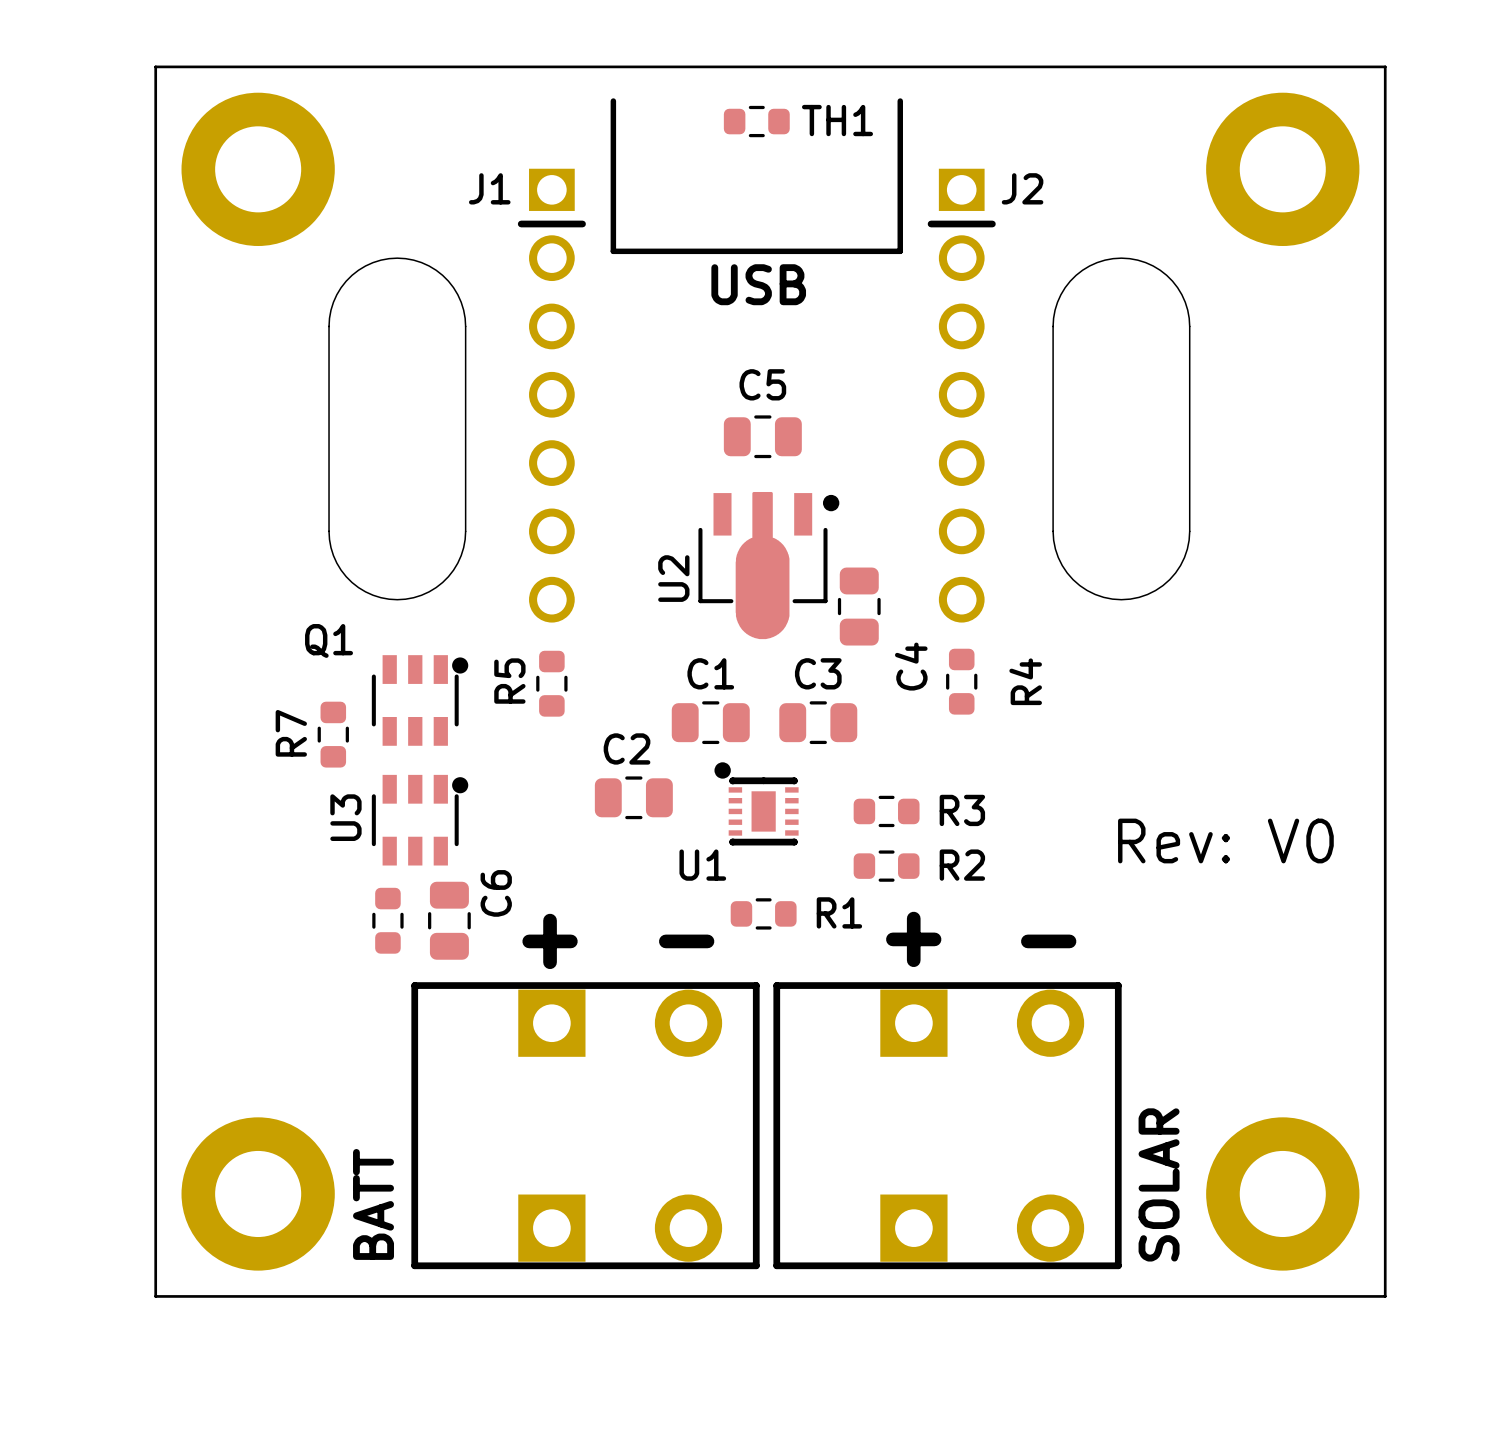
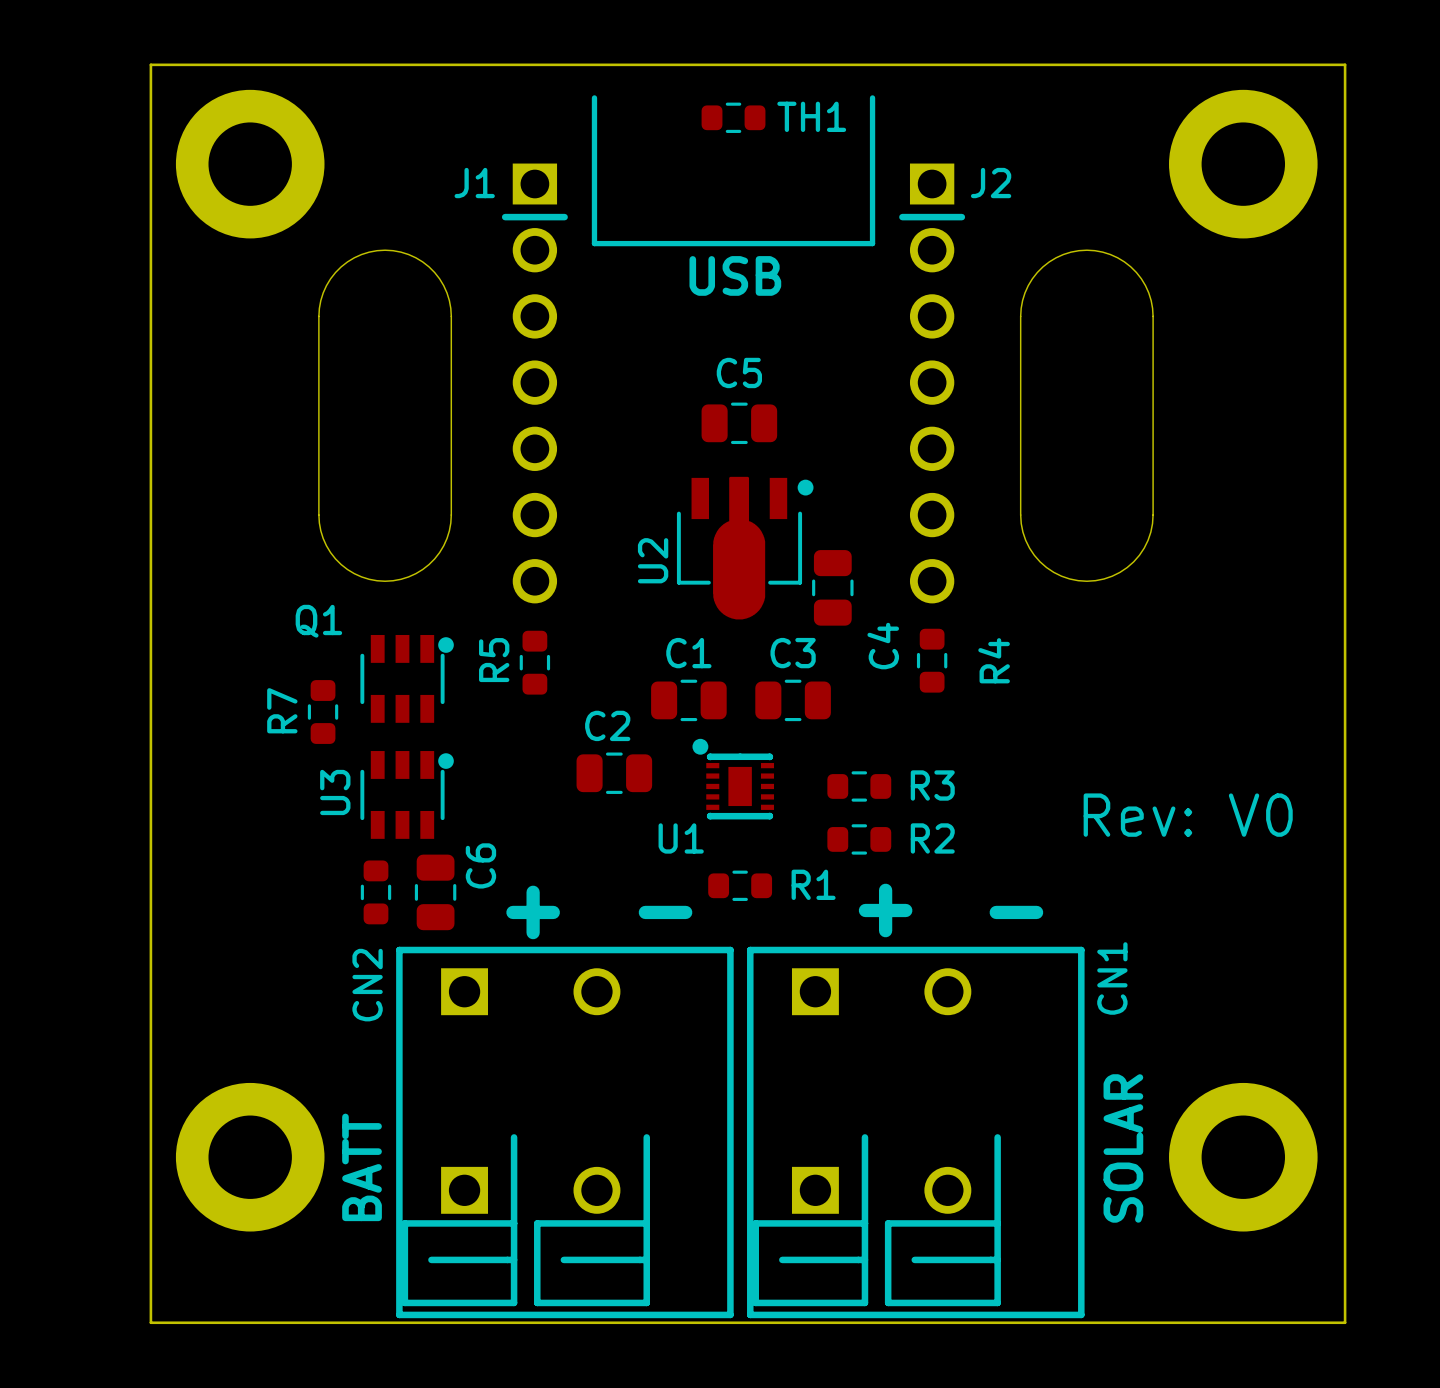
board edge: (1385, 66) (1385, 1296) (155, 1296) -> (1342, 64) (1345, 64) (1345, 1322) (150, 1322) (150, 1256)
part: (585, 1125) -> none
part: (947, 1125) -> none
CN2: none -> (564, 1132)
CN1: none -> (915, 1132)

